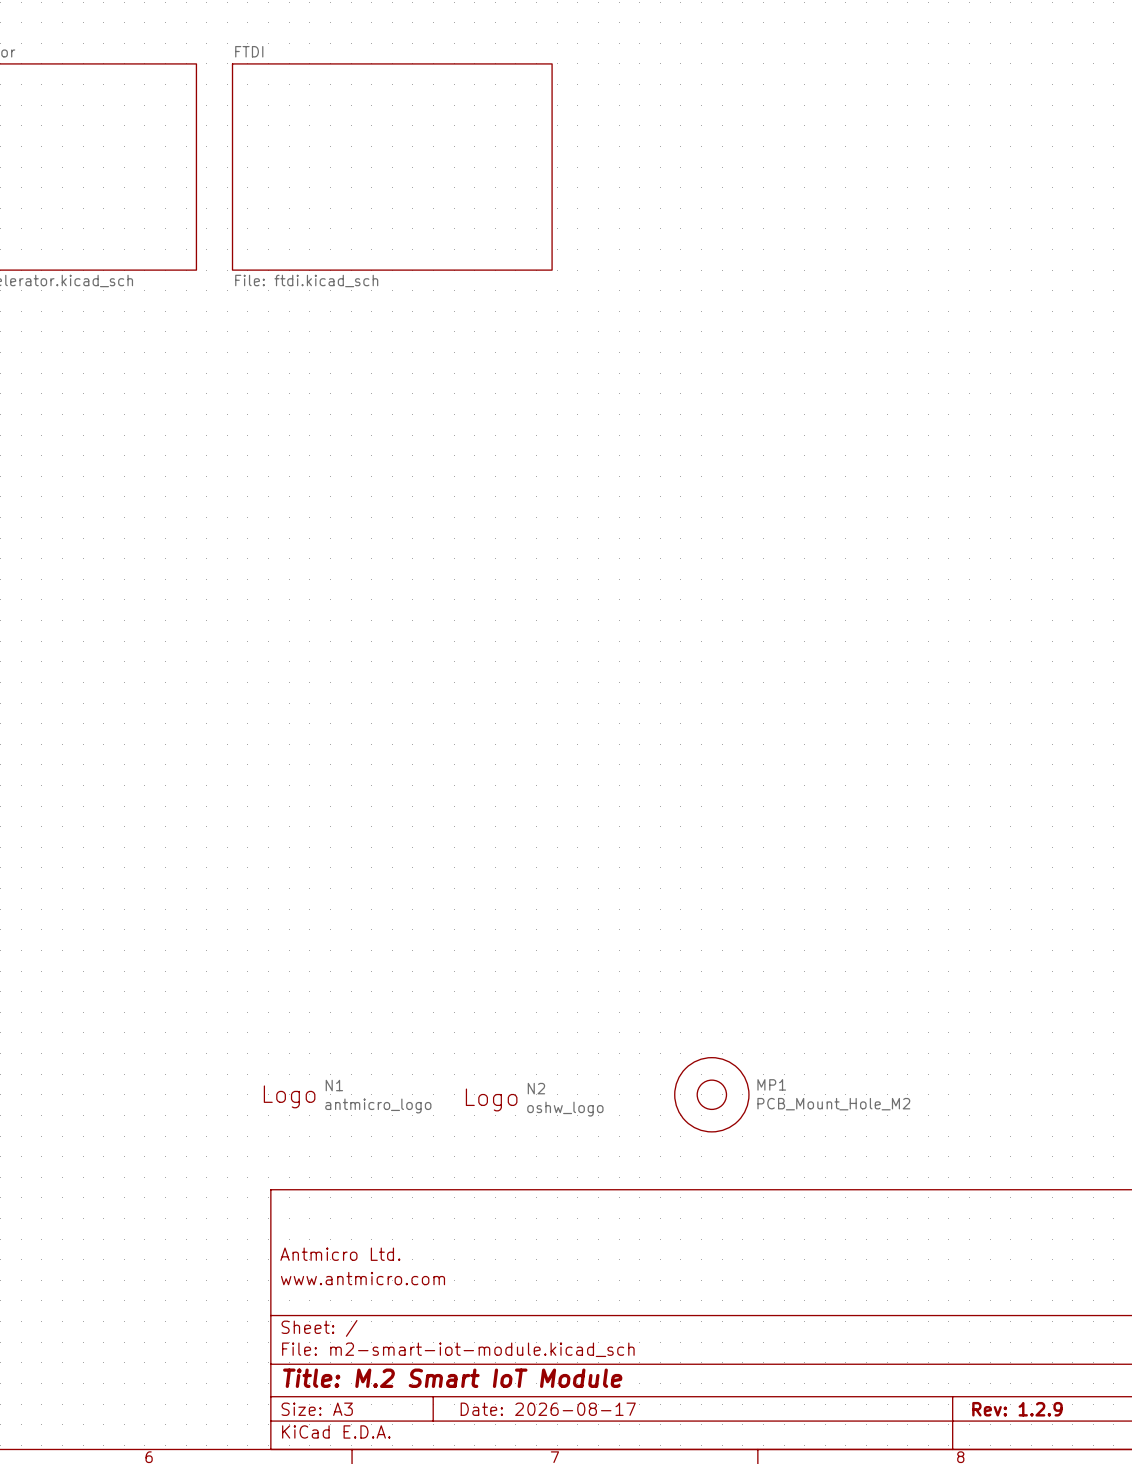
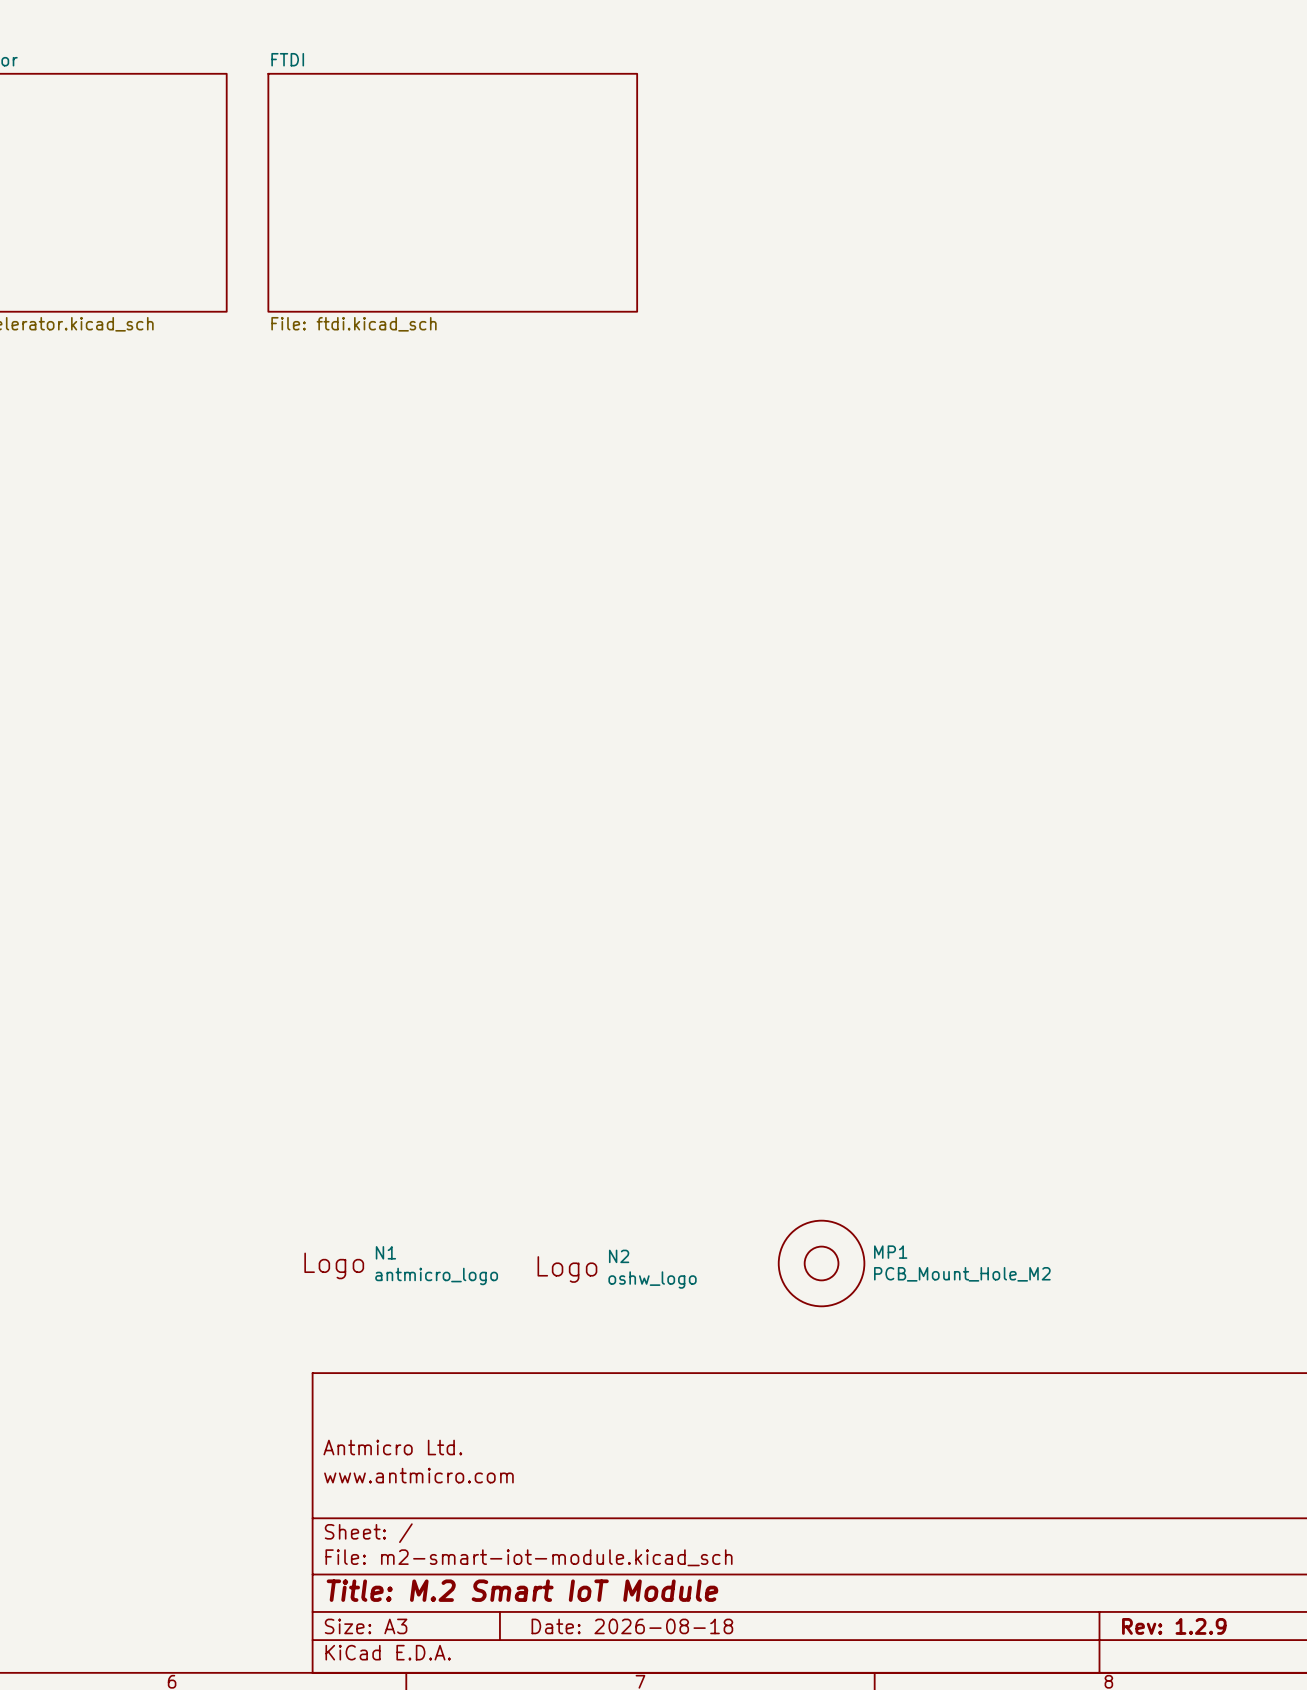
title block: Date: 2026-08-17 (548, 1409) -> Date: 2026-08-18 (632, 1626)

